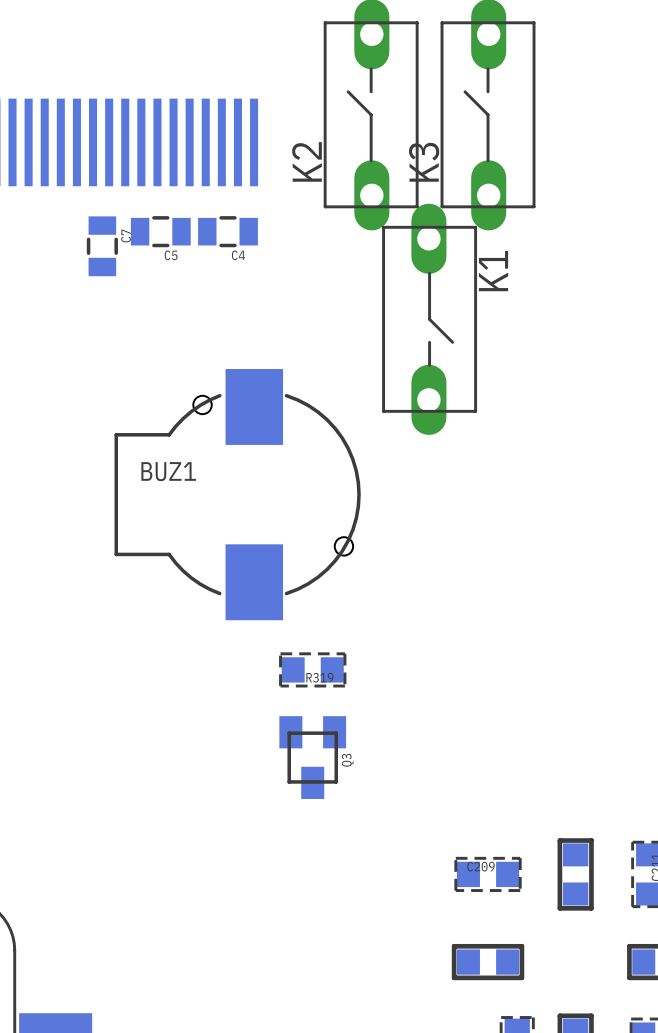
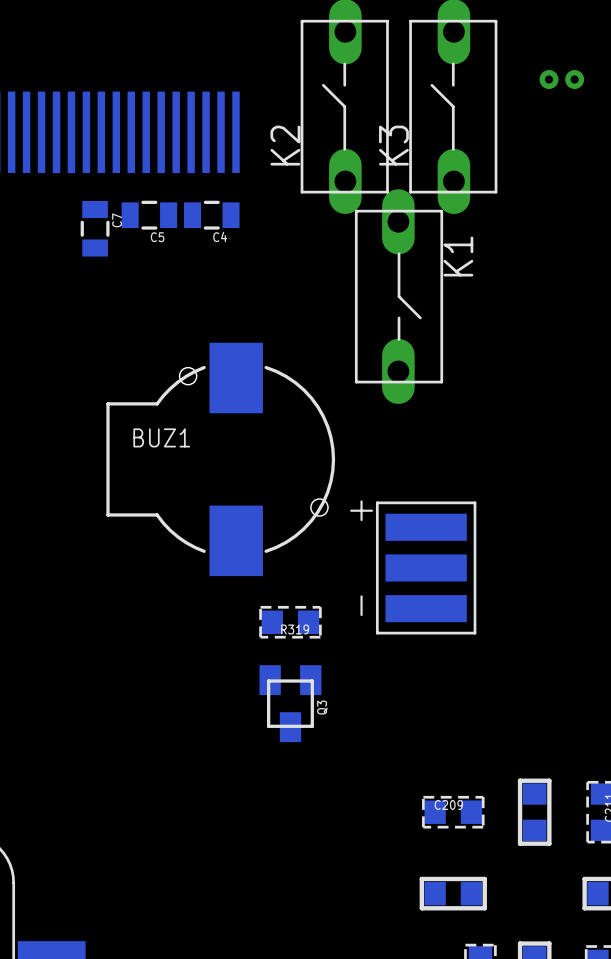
part: none -> (561, 79)
part: none -> (426, 567)

